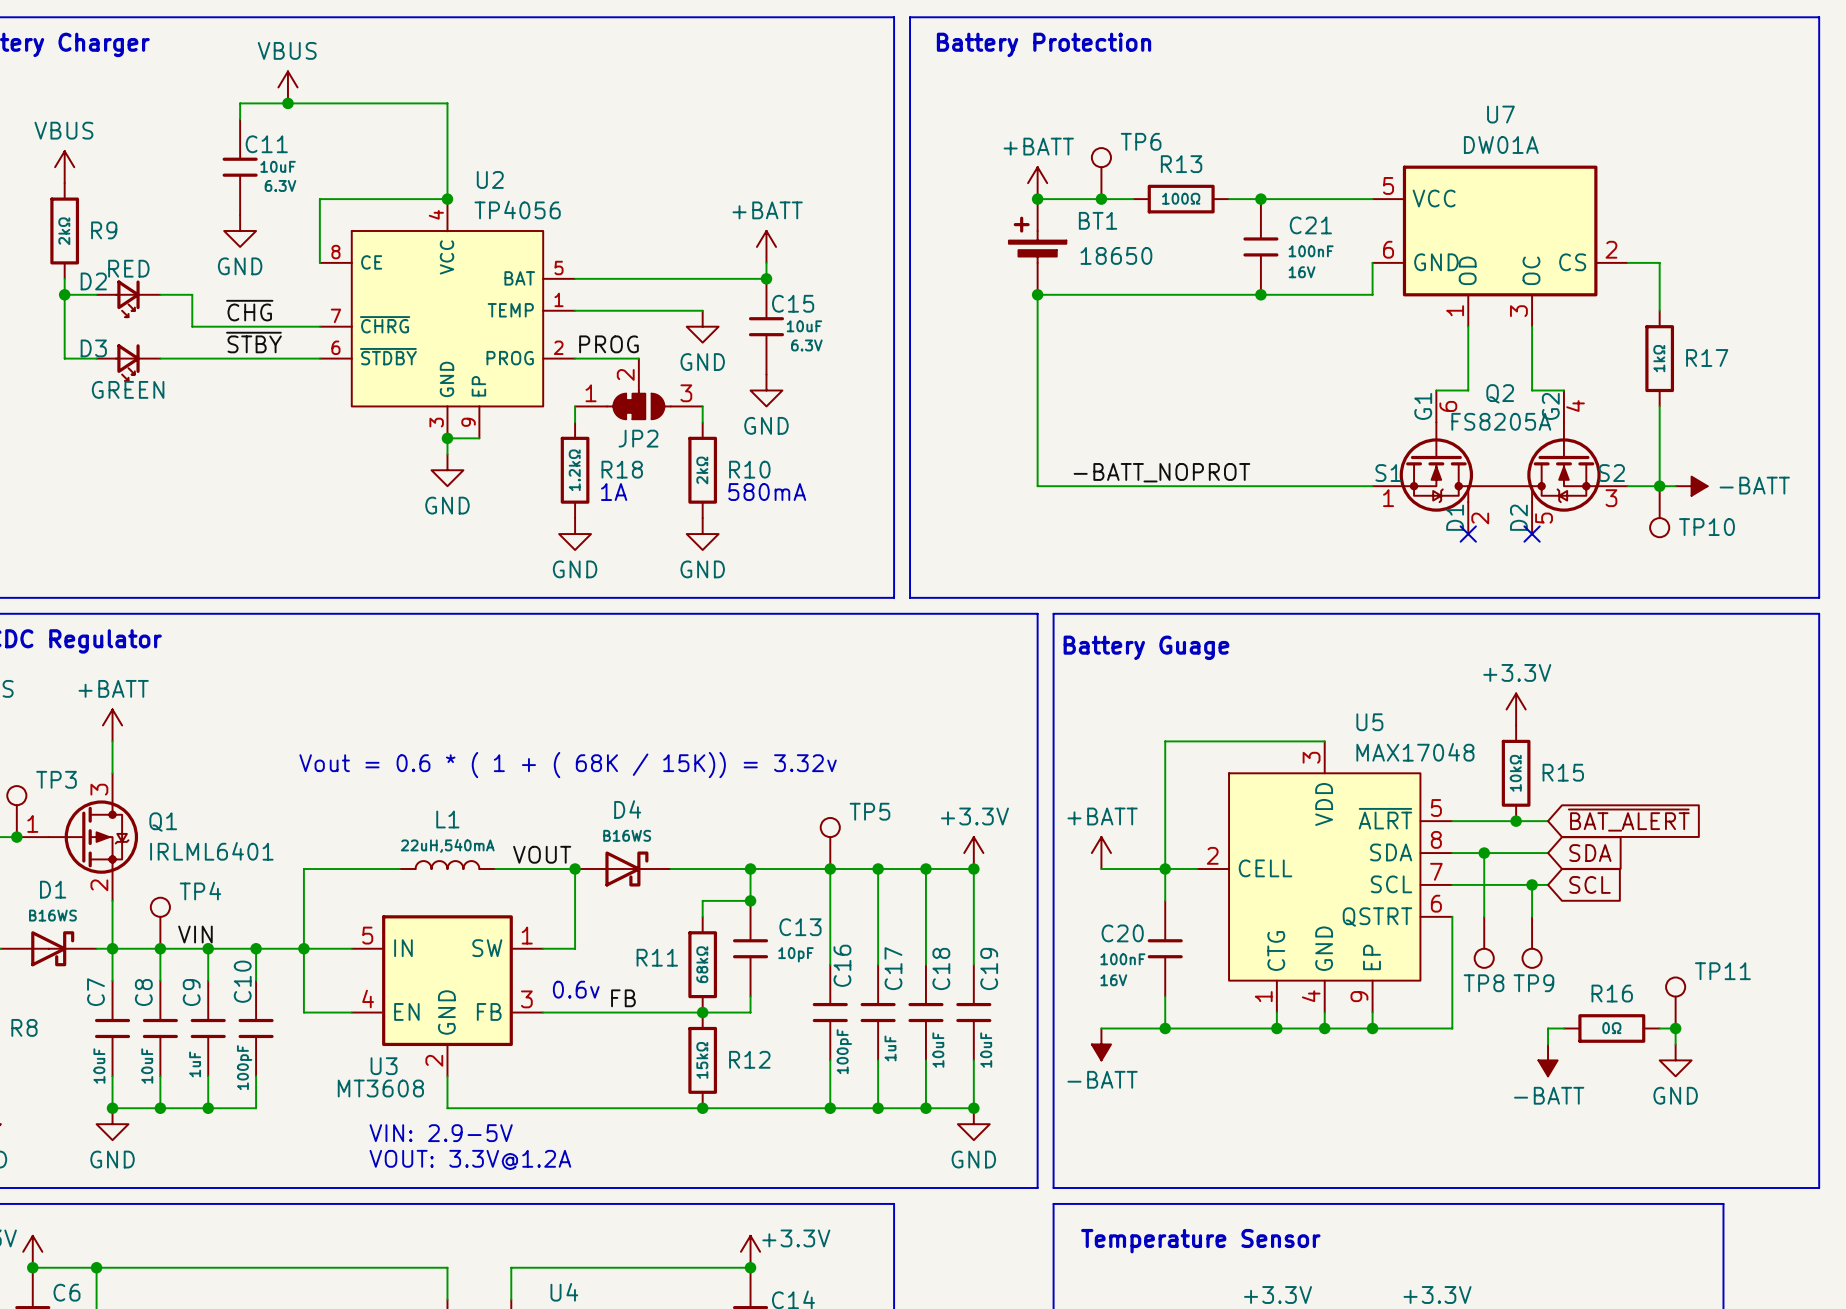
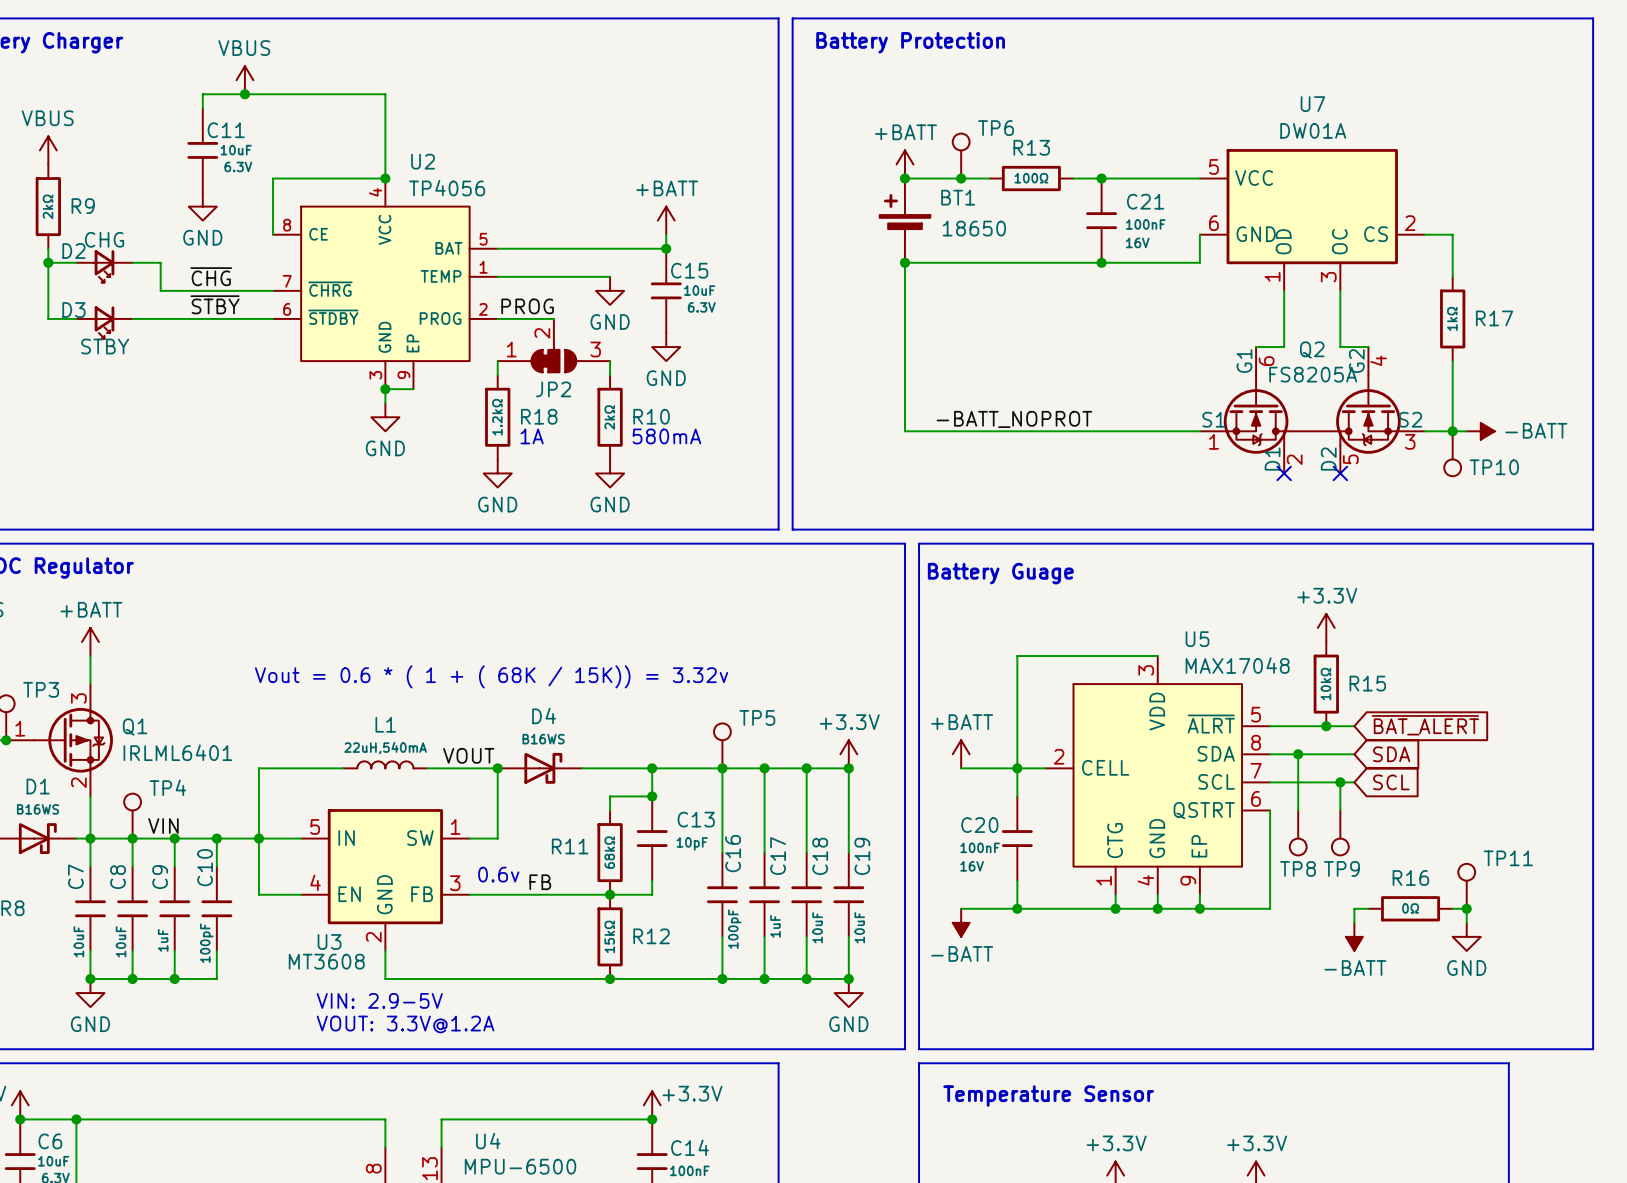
D2 value: RED (128, 268) -> CHG (104, 239)
D3 value: GREEN (128, 389) -> STBY (105, 346)

